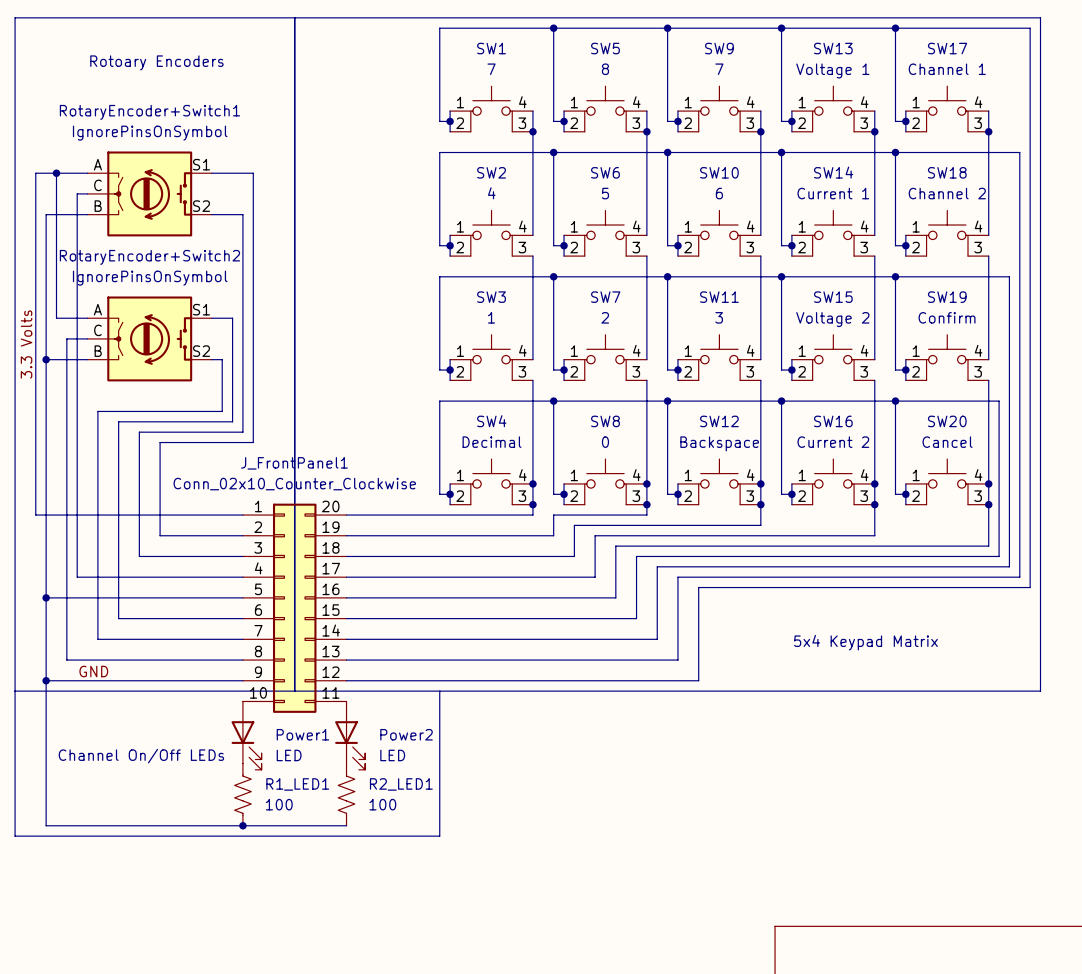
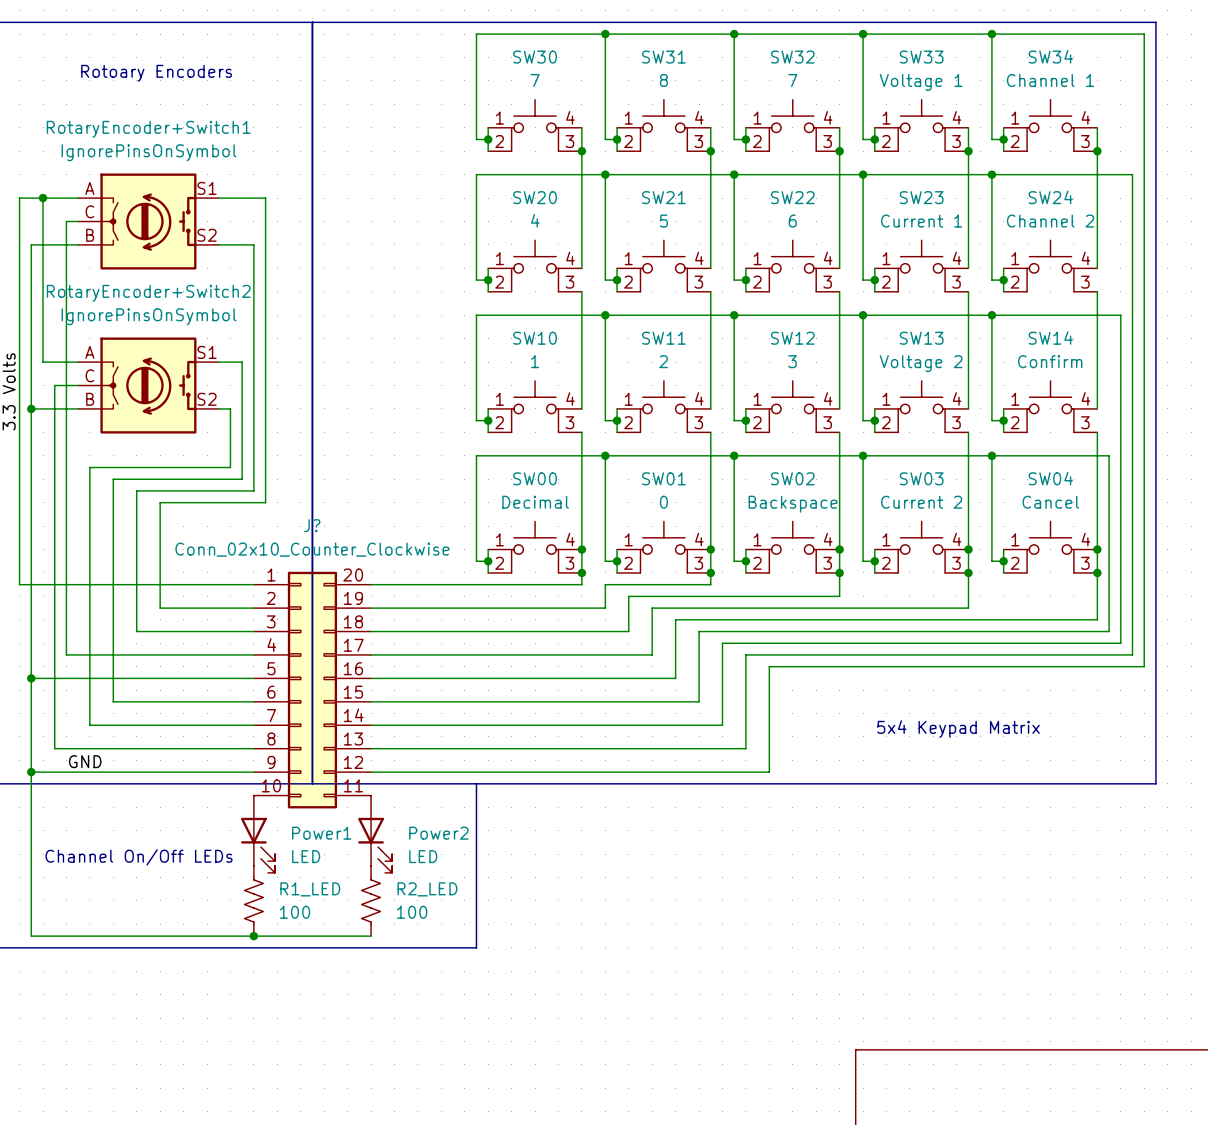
SW1 name: SW1 (491, 48) -> SW30 (535, 57)
SW5 name: SW5 (605, 48) -> SW31 (663, 57)
SW9 name: SW9 (719, 48) -> SW32 (792, 57)
SW13 name: SW13 (833, 48) -> SW33 (921, 57)
SW17 name: SW17 (947, 48) -> SW34 (1050, 56)
SW2 name: SW2 (491, 172) -> SW20 (535, 197)
SW6 name: SW6 (605, 172) -> SW21 (663, 197)
SW10 name: SW10 (719, 172) -> SW22 (792, 197)
SW14 name: SW14 (833, 172) -> SW23 (921, 197)
SW18 name: SW18 (947, 172) -> SW24 (1050, 197)
SW3 name: SW3 (491, 297) -> SW10 (535, 338)
SW7 name: SW7 (605, 297) -> SW11 (663, 338)
SW11 name: SW11 (719, 297) -> SW12 (792, 338)
SW15 name: SW15 (833, 297) -> SW13 (921, 338)
SW19 name: SW19 (947, 297) -> SW14 (1050, 337)
SW4 name: SW4 (491, 421) -> SW00 (535, 478)
SW8 name: SW8 (605, 421) -> SW01 (663, 478)
SW12 name: SW12 (719, 421) -> SW02 (792, 478)
SW16 name: SW16 (833, 421) -> SW03 (921, 478)
SW20 name: SW20 (947, 421) -> SW04 (1050, 478)
J_FrontPanel1 name: J_FrontPanel1 (294, 463) -> J? (312, 525)
R1_LED1 name: R1_LED1 (297, 784) -> R1_LED (310, 889)
R2_LED1 name: R2_LED1 (401, 784) -> R2_LED (427, 889)

